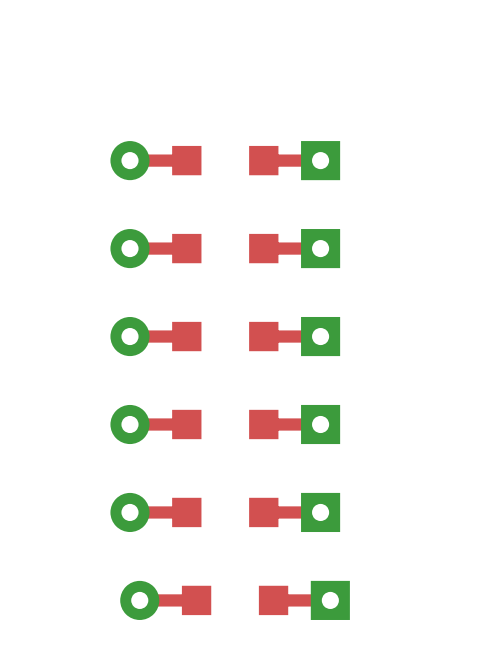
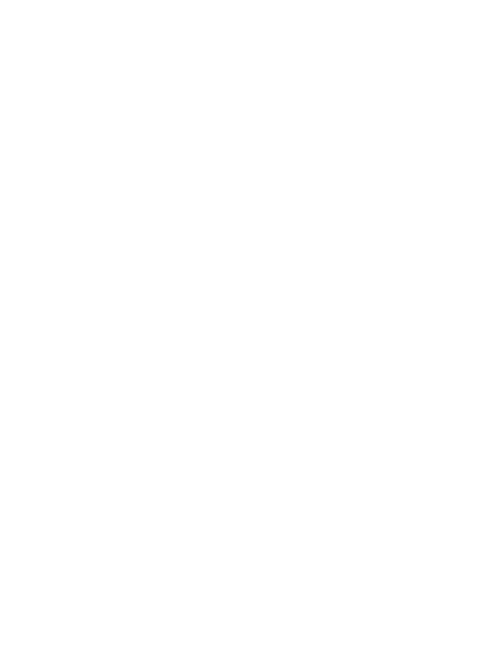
part: (225, 160) -> none
part: (225, 248) -> none
part: (225, 336) -> none
part: (225, 424) -> none
part: (225, 512) -> none
part: (235, 600) -> none

